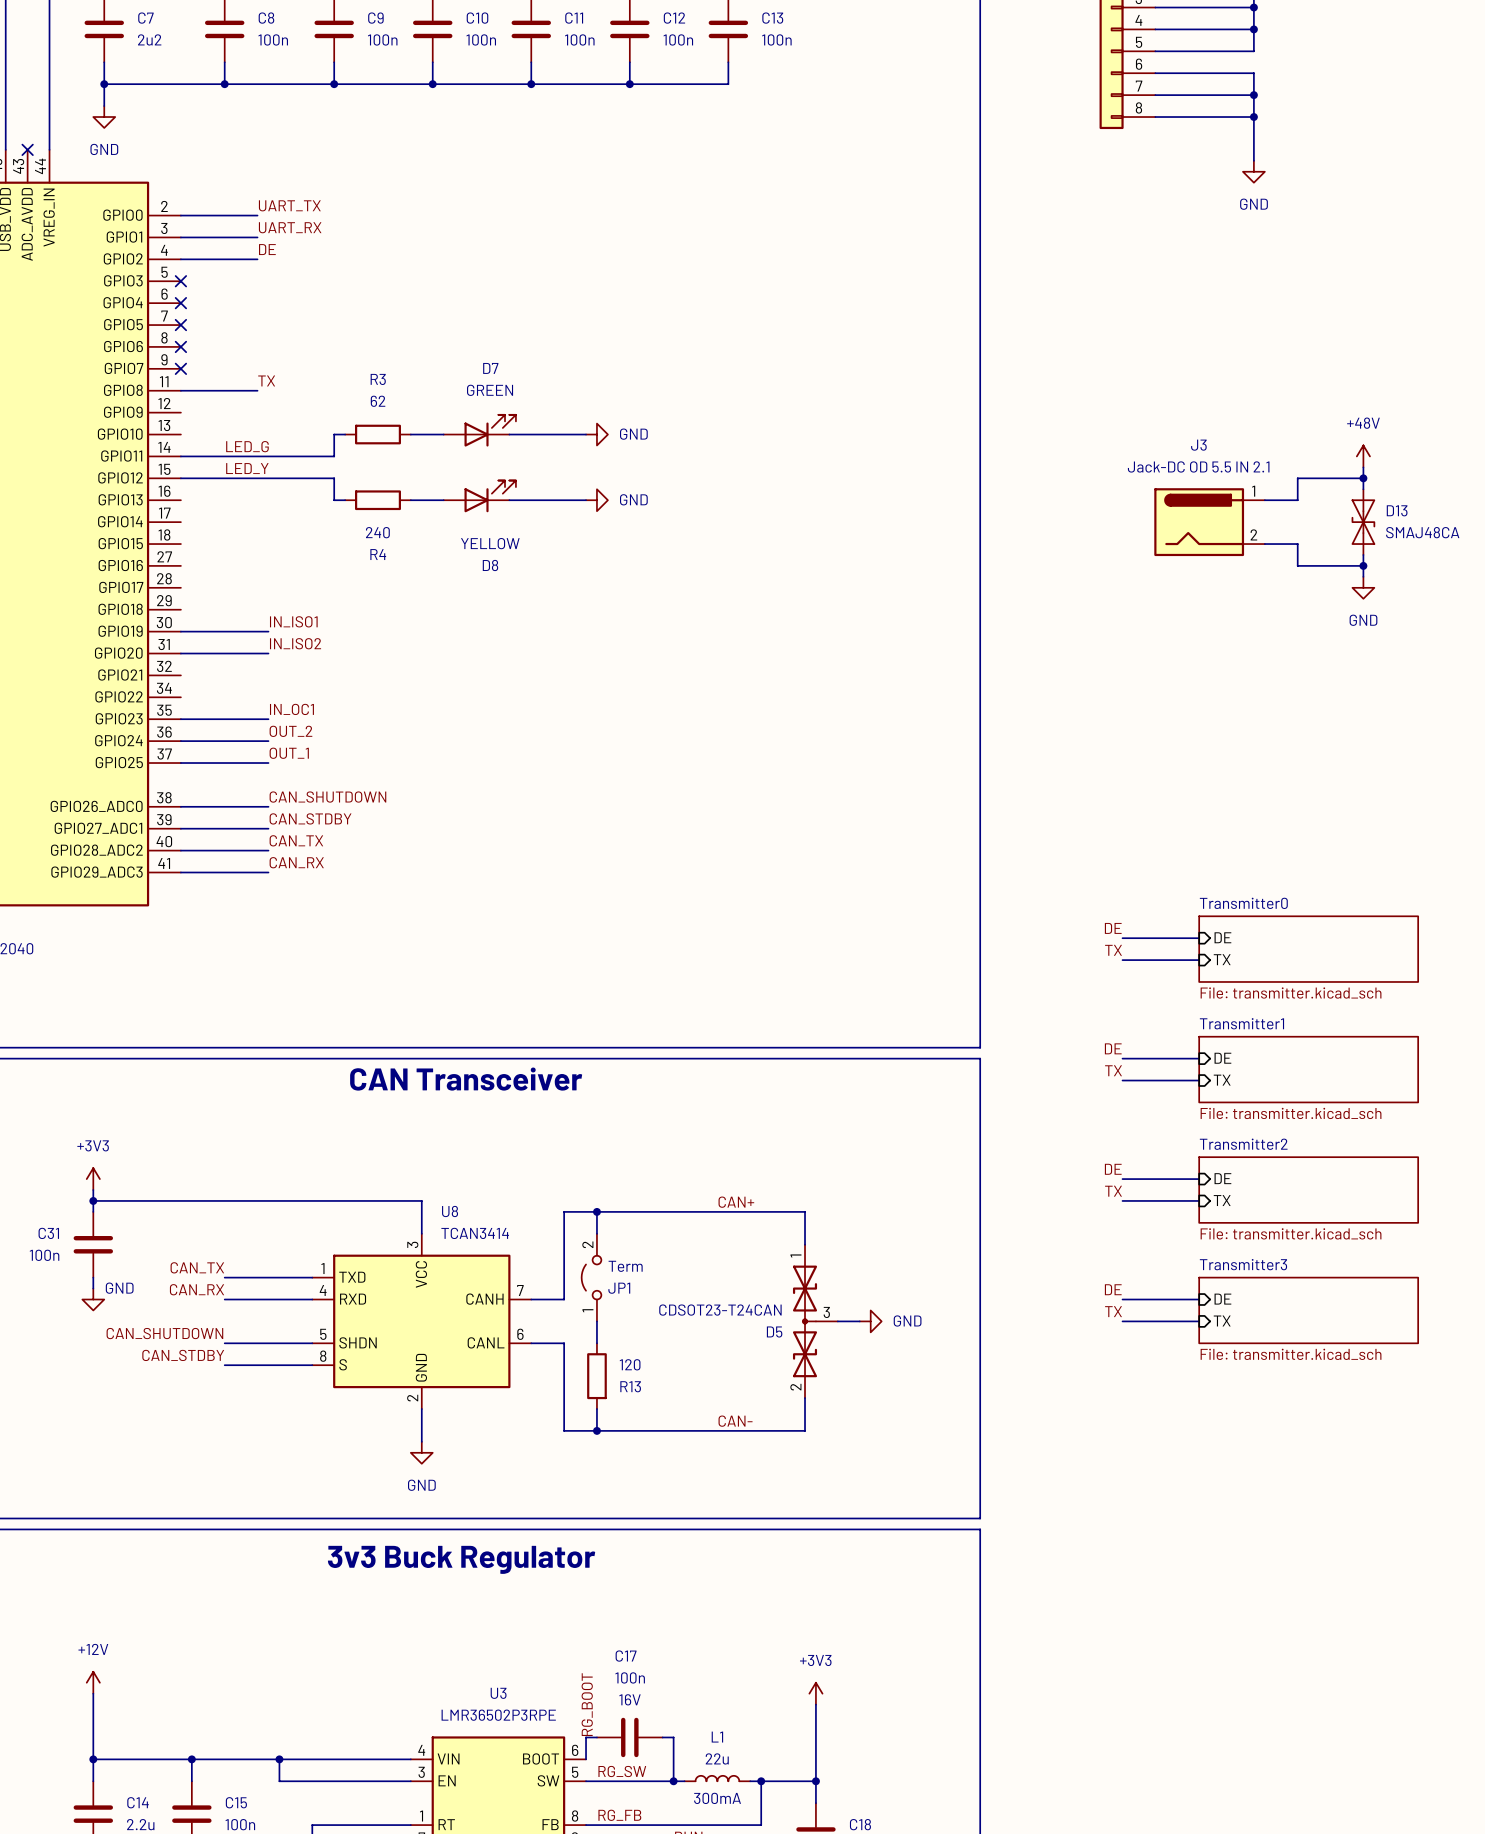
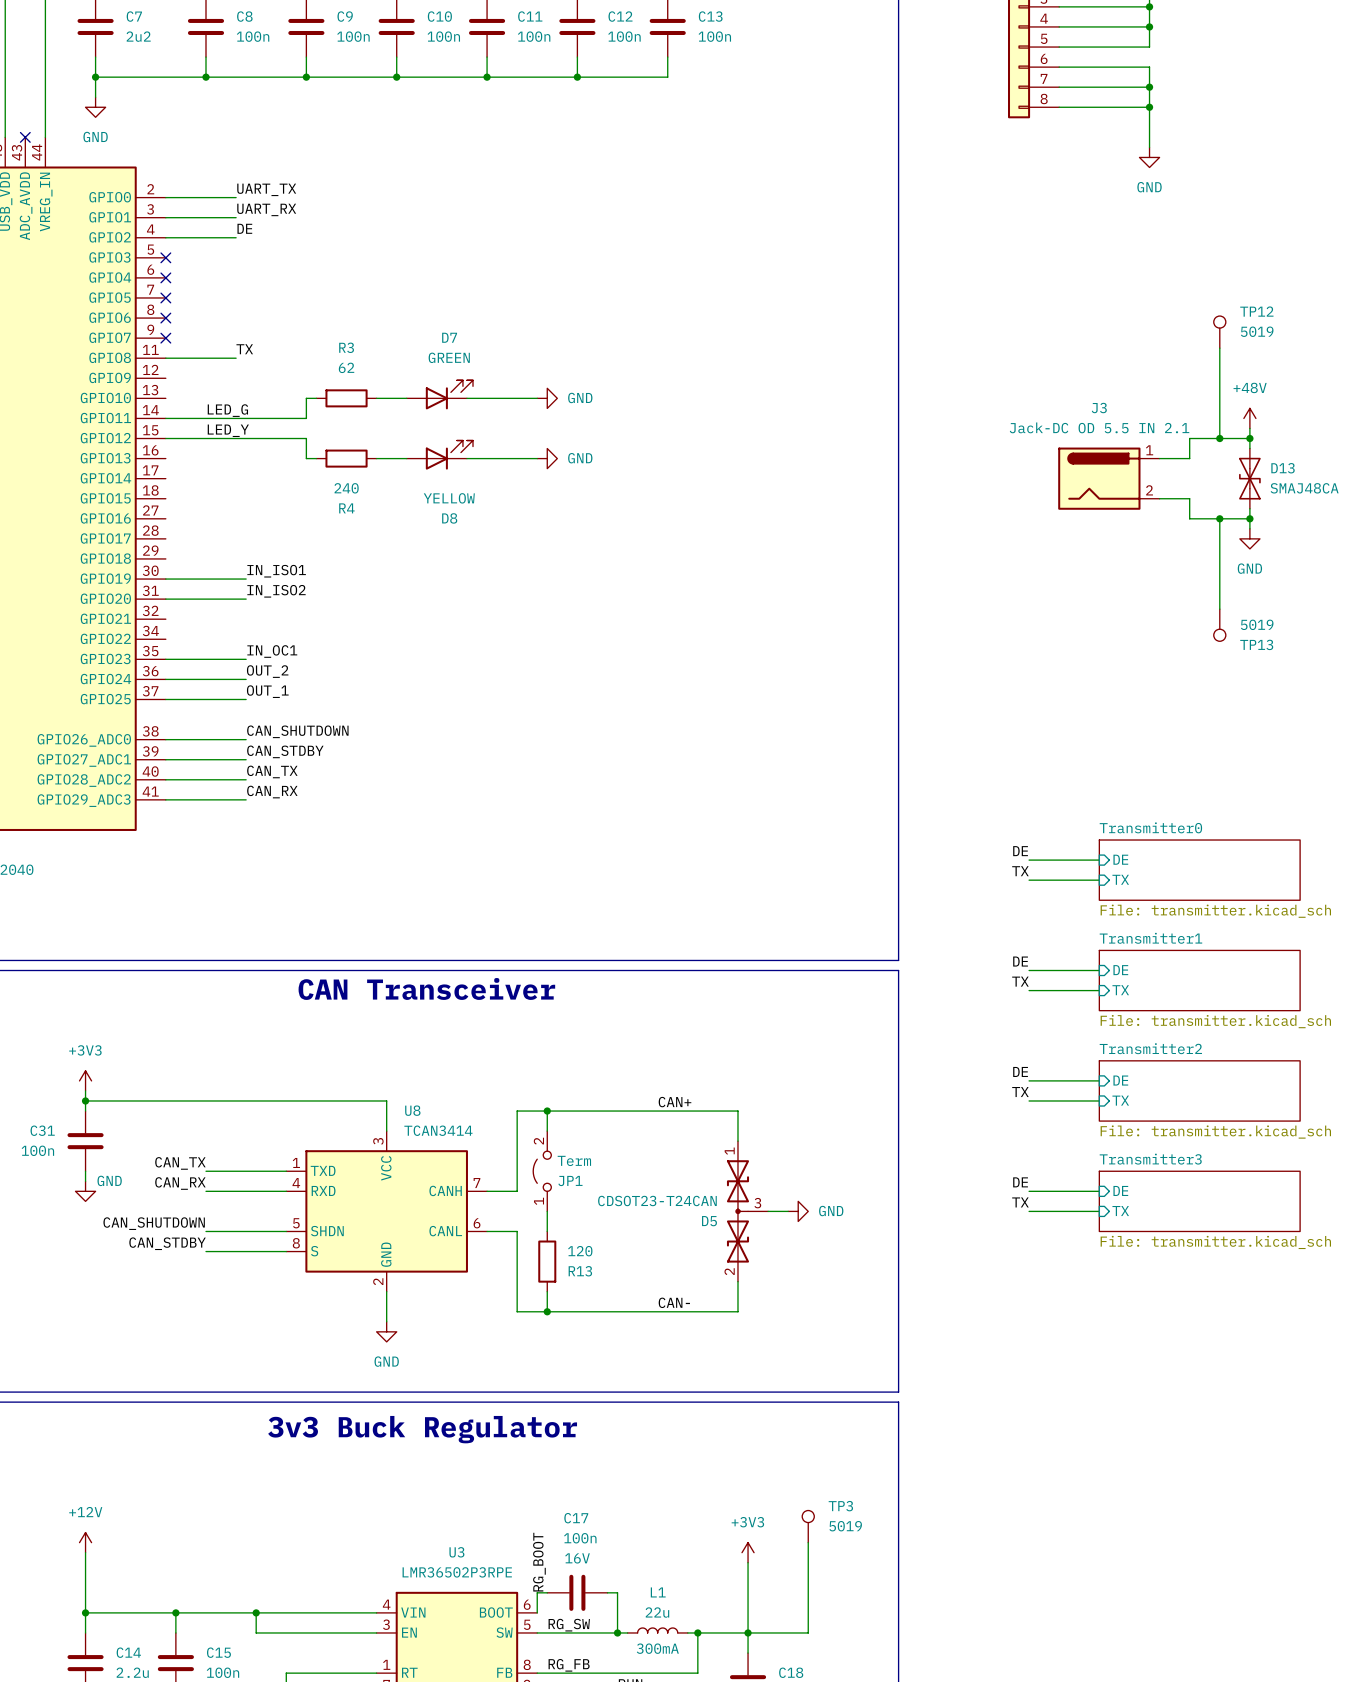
TP12: none -> 5019 (1219, 332)
wire: none -> (1219, 348) (1219, 438)
junction: none -> (1219, 438)
wire: none -> (1219, 518) (1219, 609)
junction: none -> (1219, 518)
TP13: none -> 5019 (1219, 625)
TP3: none -> 5019 (808, 1526)
wire: none -> (808, 1542) (808, 1632) (748, 1632)

